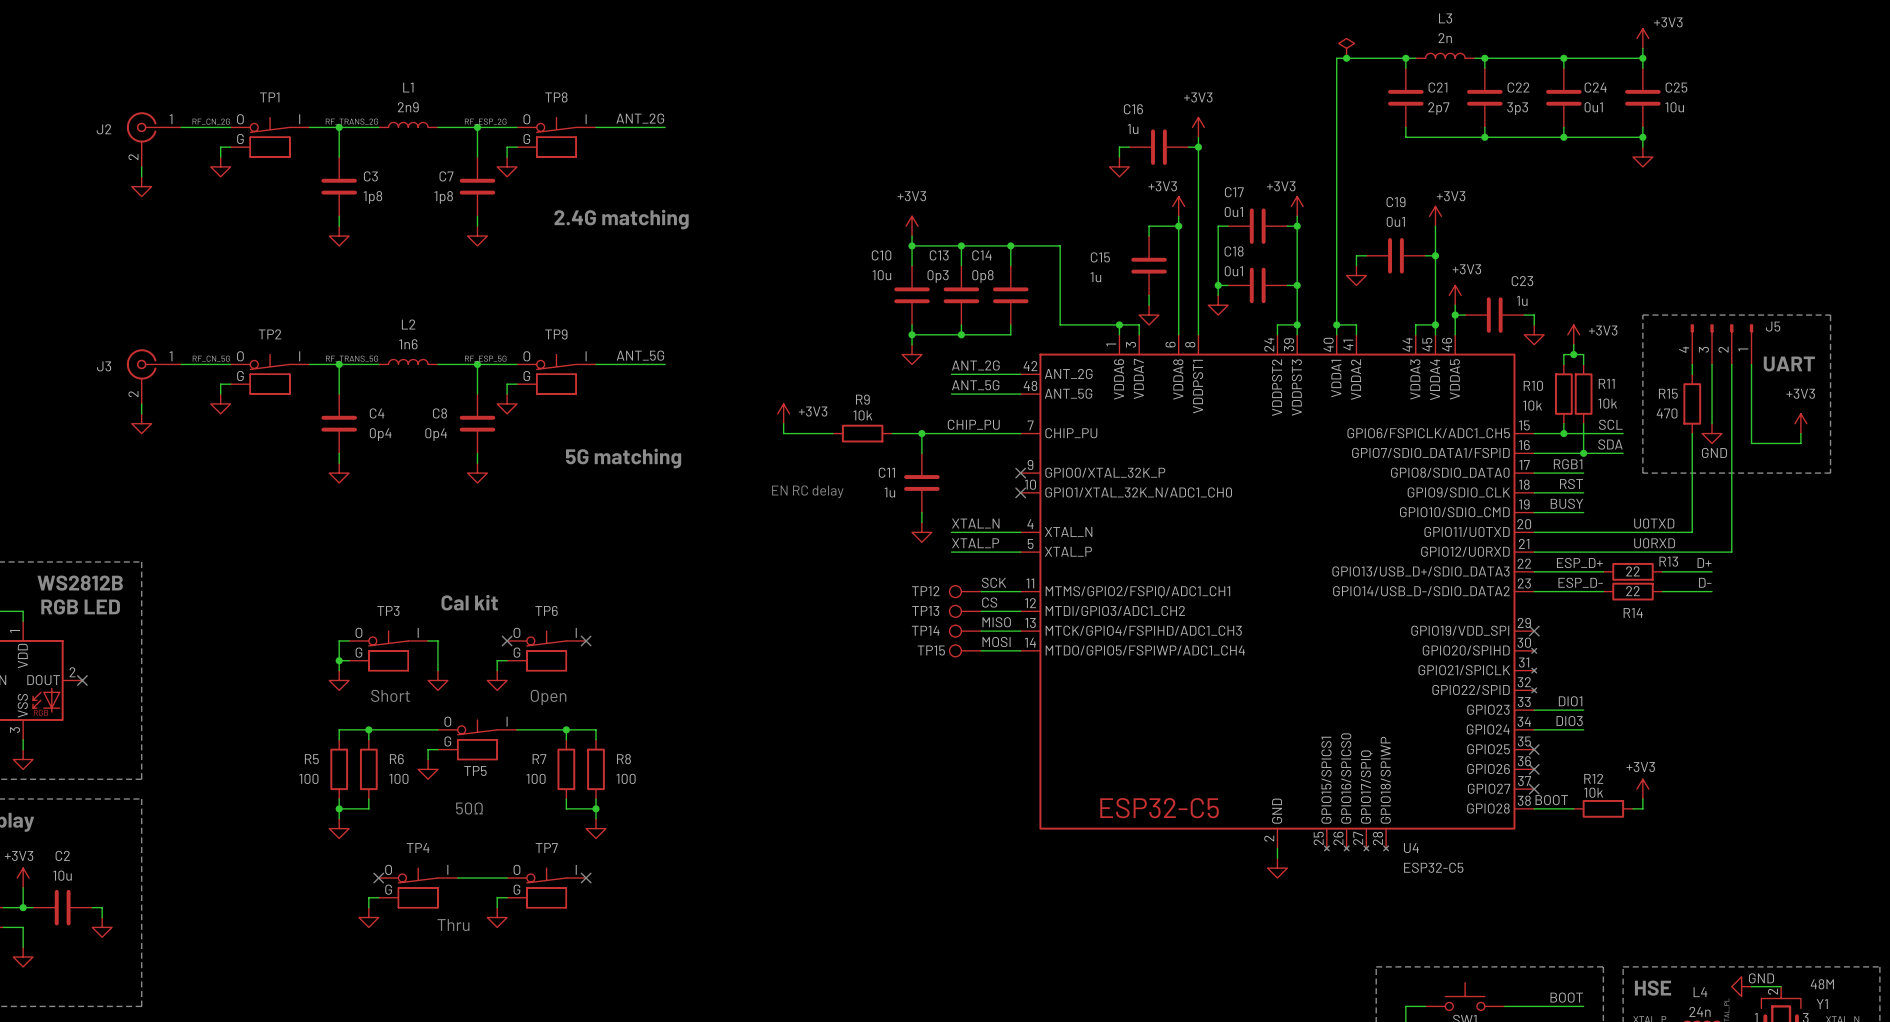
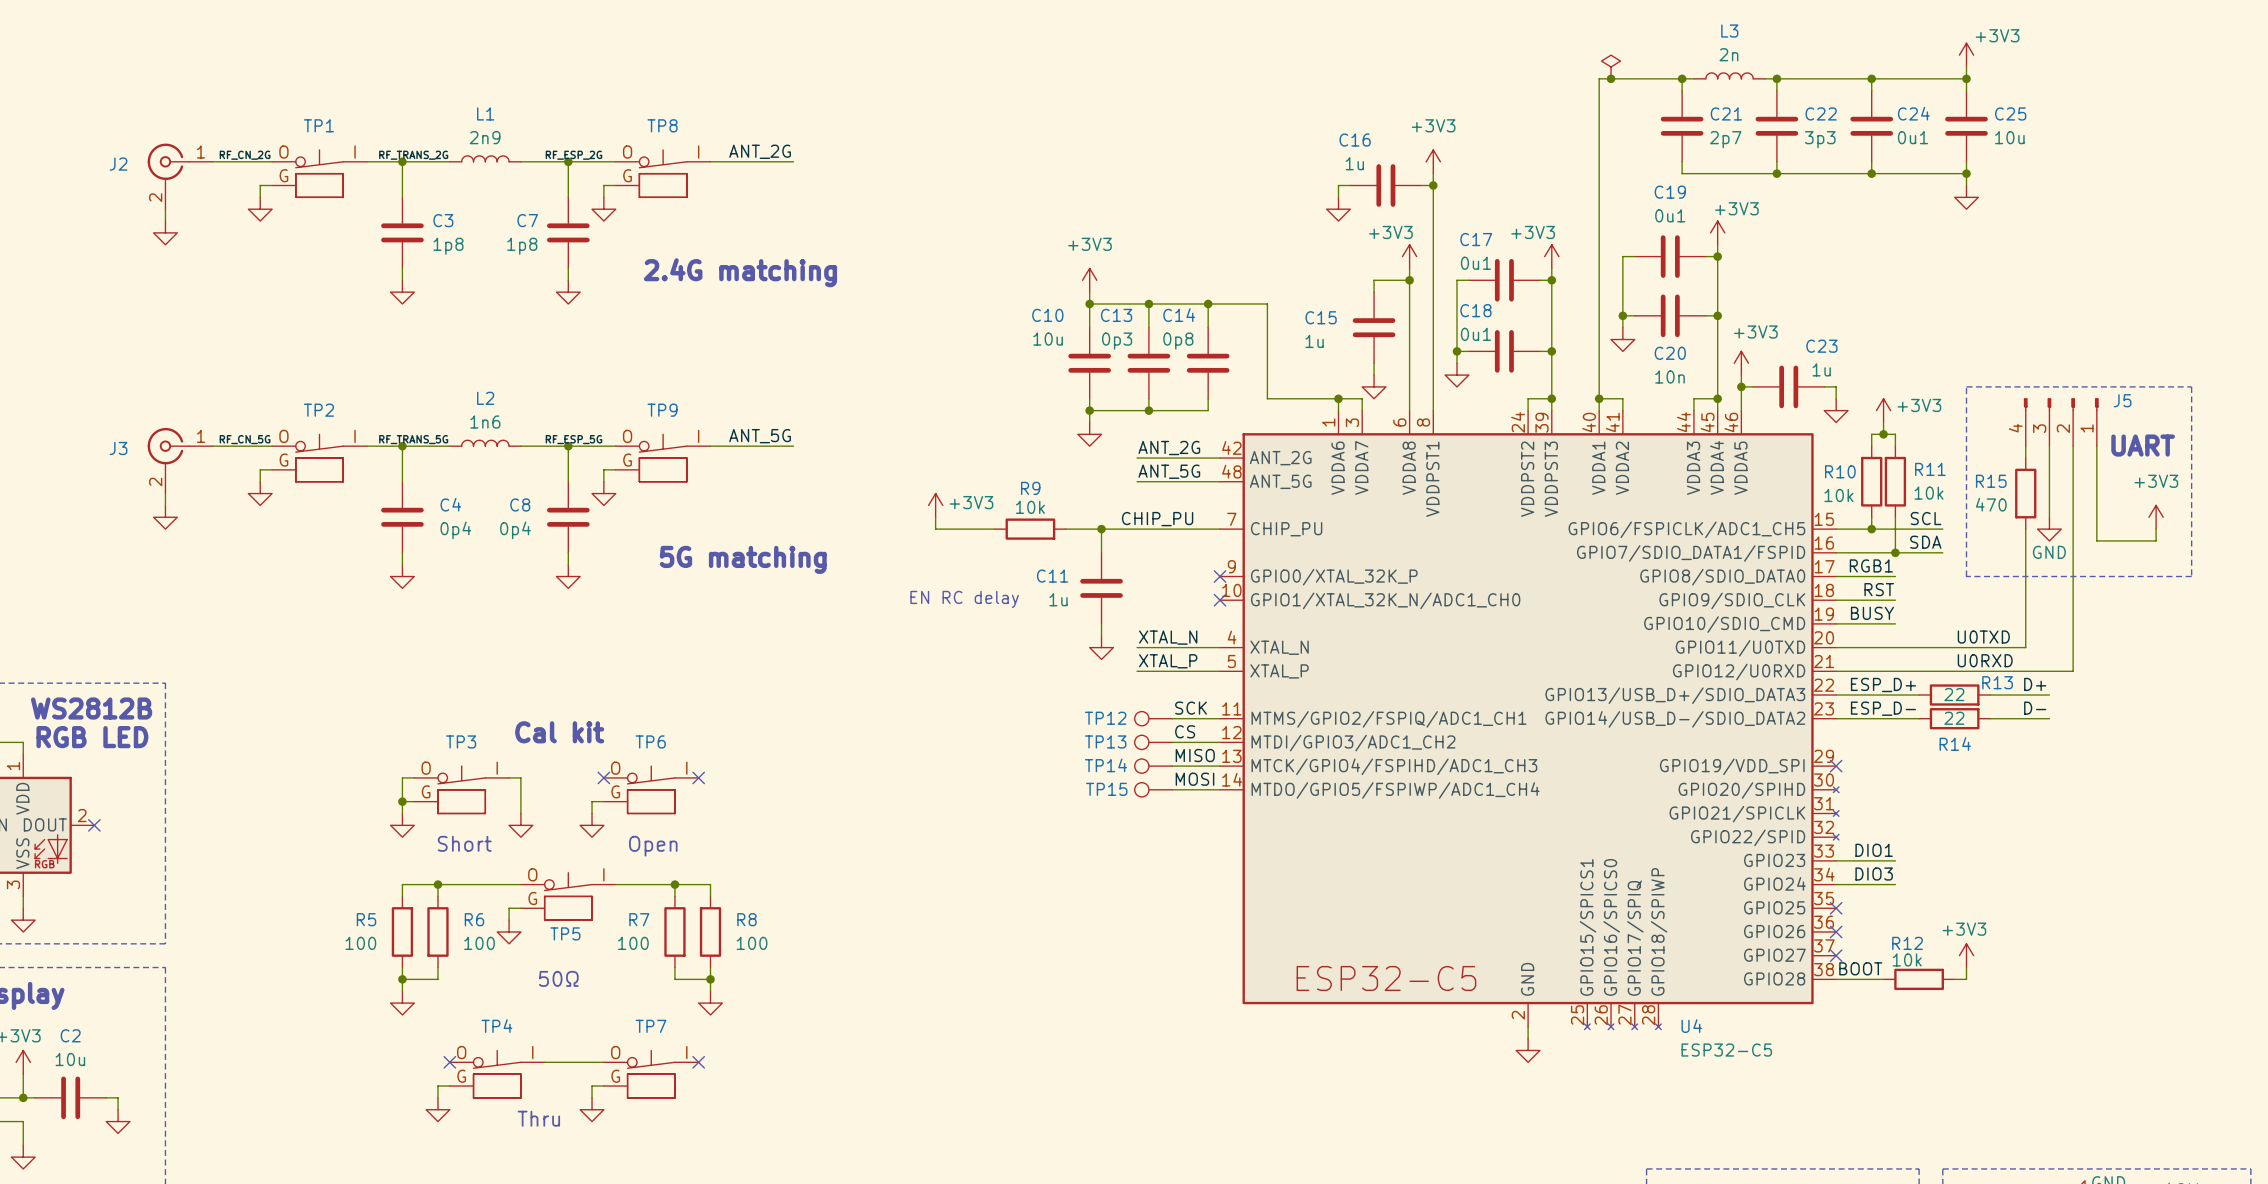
C19 name: C19 (1396, 202) -> C20 (1670, 353)
wire: none -> (1634, 256) (1622, 256) (1622, 315)
C19: none -> 0u1 (1670, 256)
wire: none -> (1705, 256) (1717, 256)
junction: none -> (1717, 256)
power symbol position: +3V3 (1435, 216) -> +3V3 (1717, 232)
C19 value: 0u1 (1395, 221) -> 10n (1669, 377)
junction: none -> (1622, 315)

